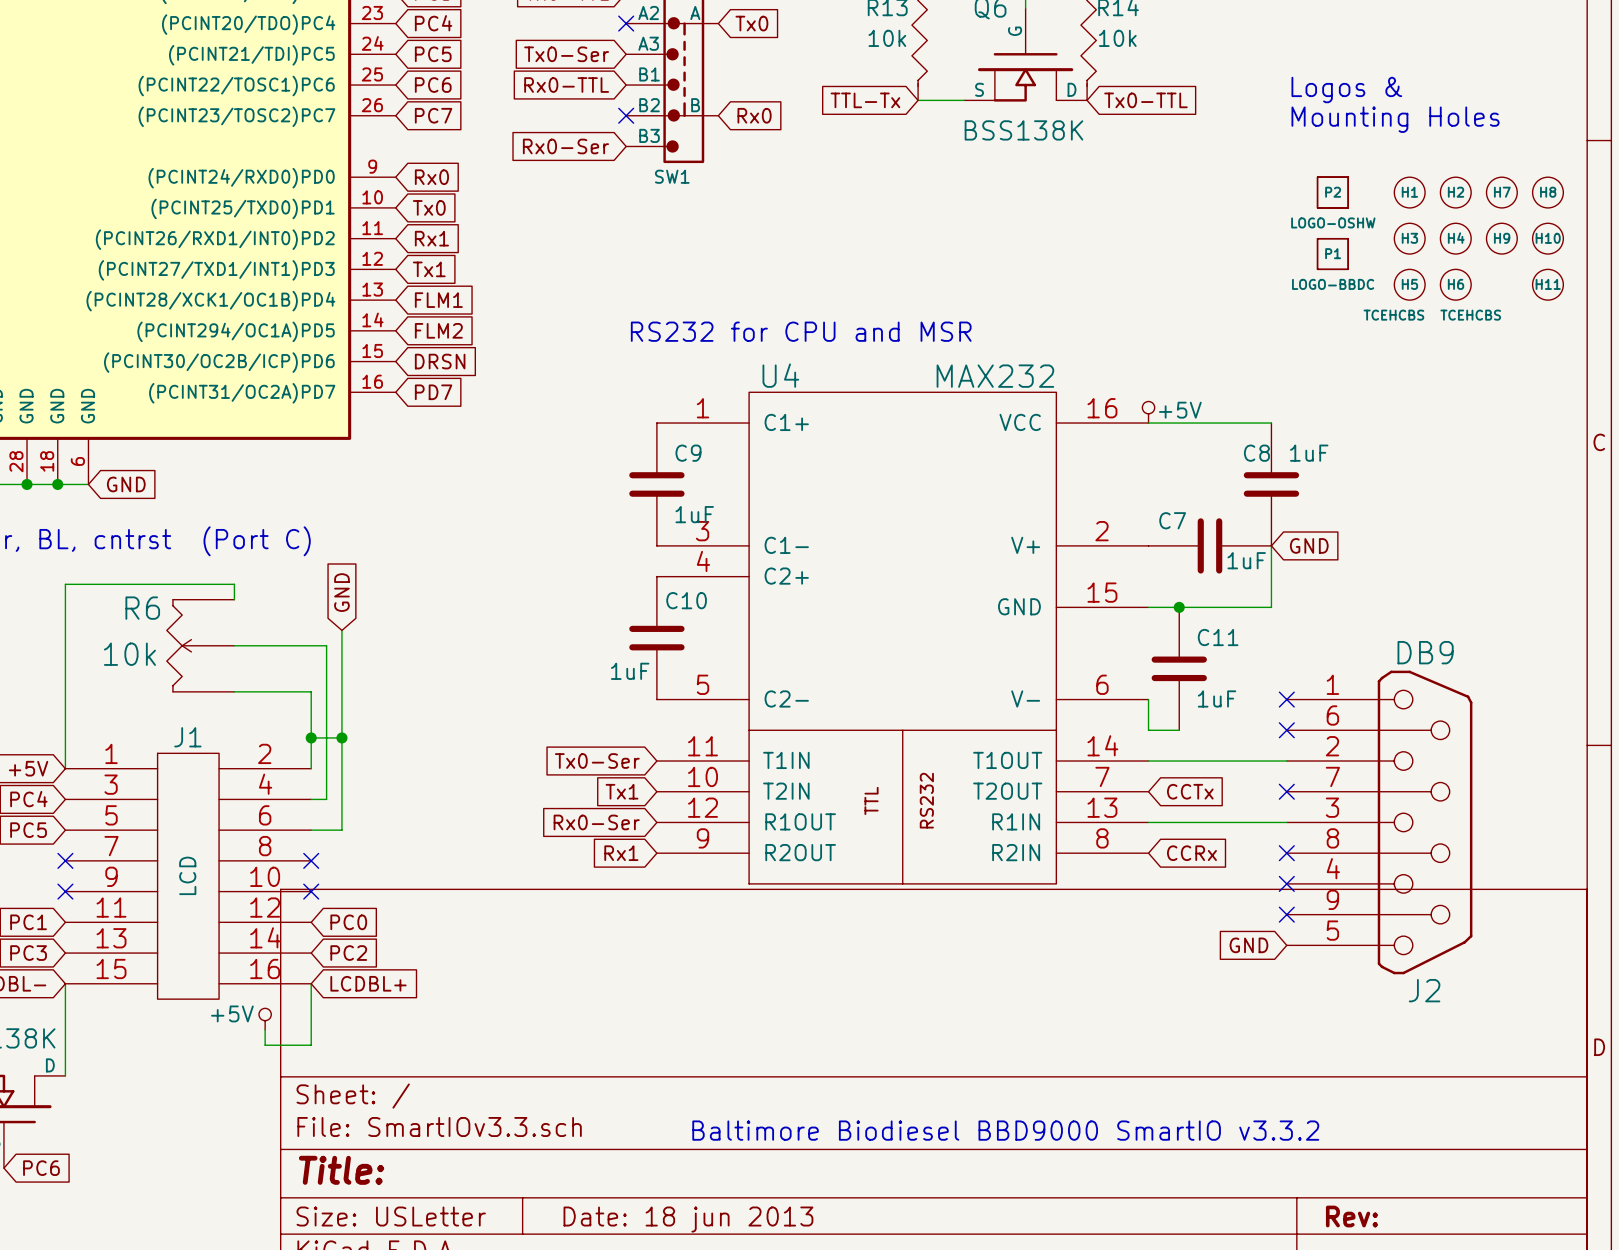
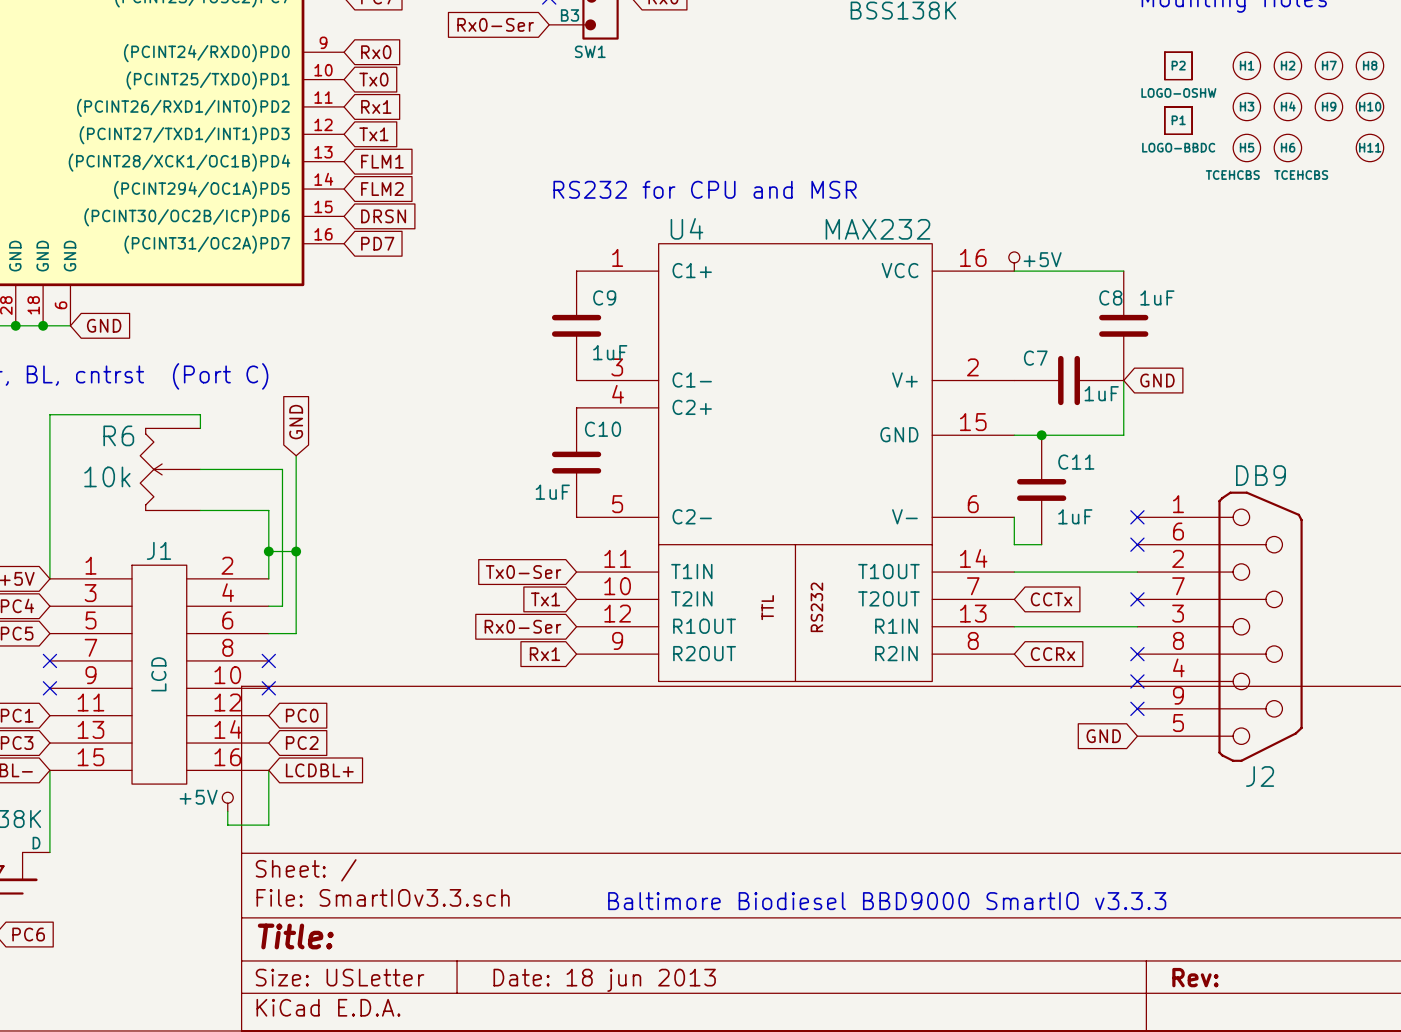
text: Baltimore Biodiesel BBD9000 SmartIO v3.3.2 (1005, 1130) -> Baltimore Biodiesel BBD9000 SmartIO v3.3.3 (887, 901)

